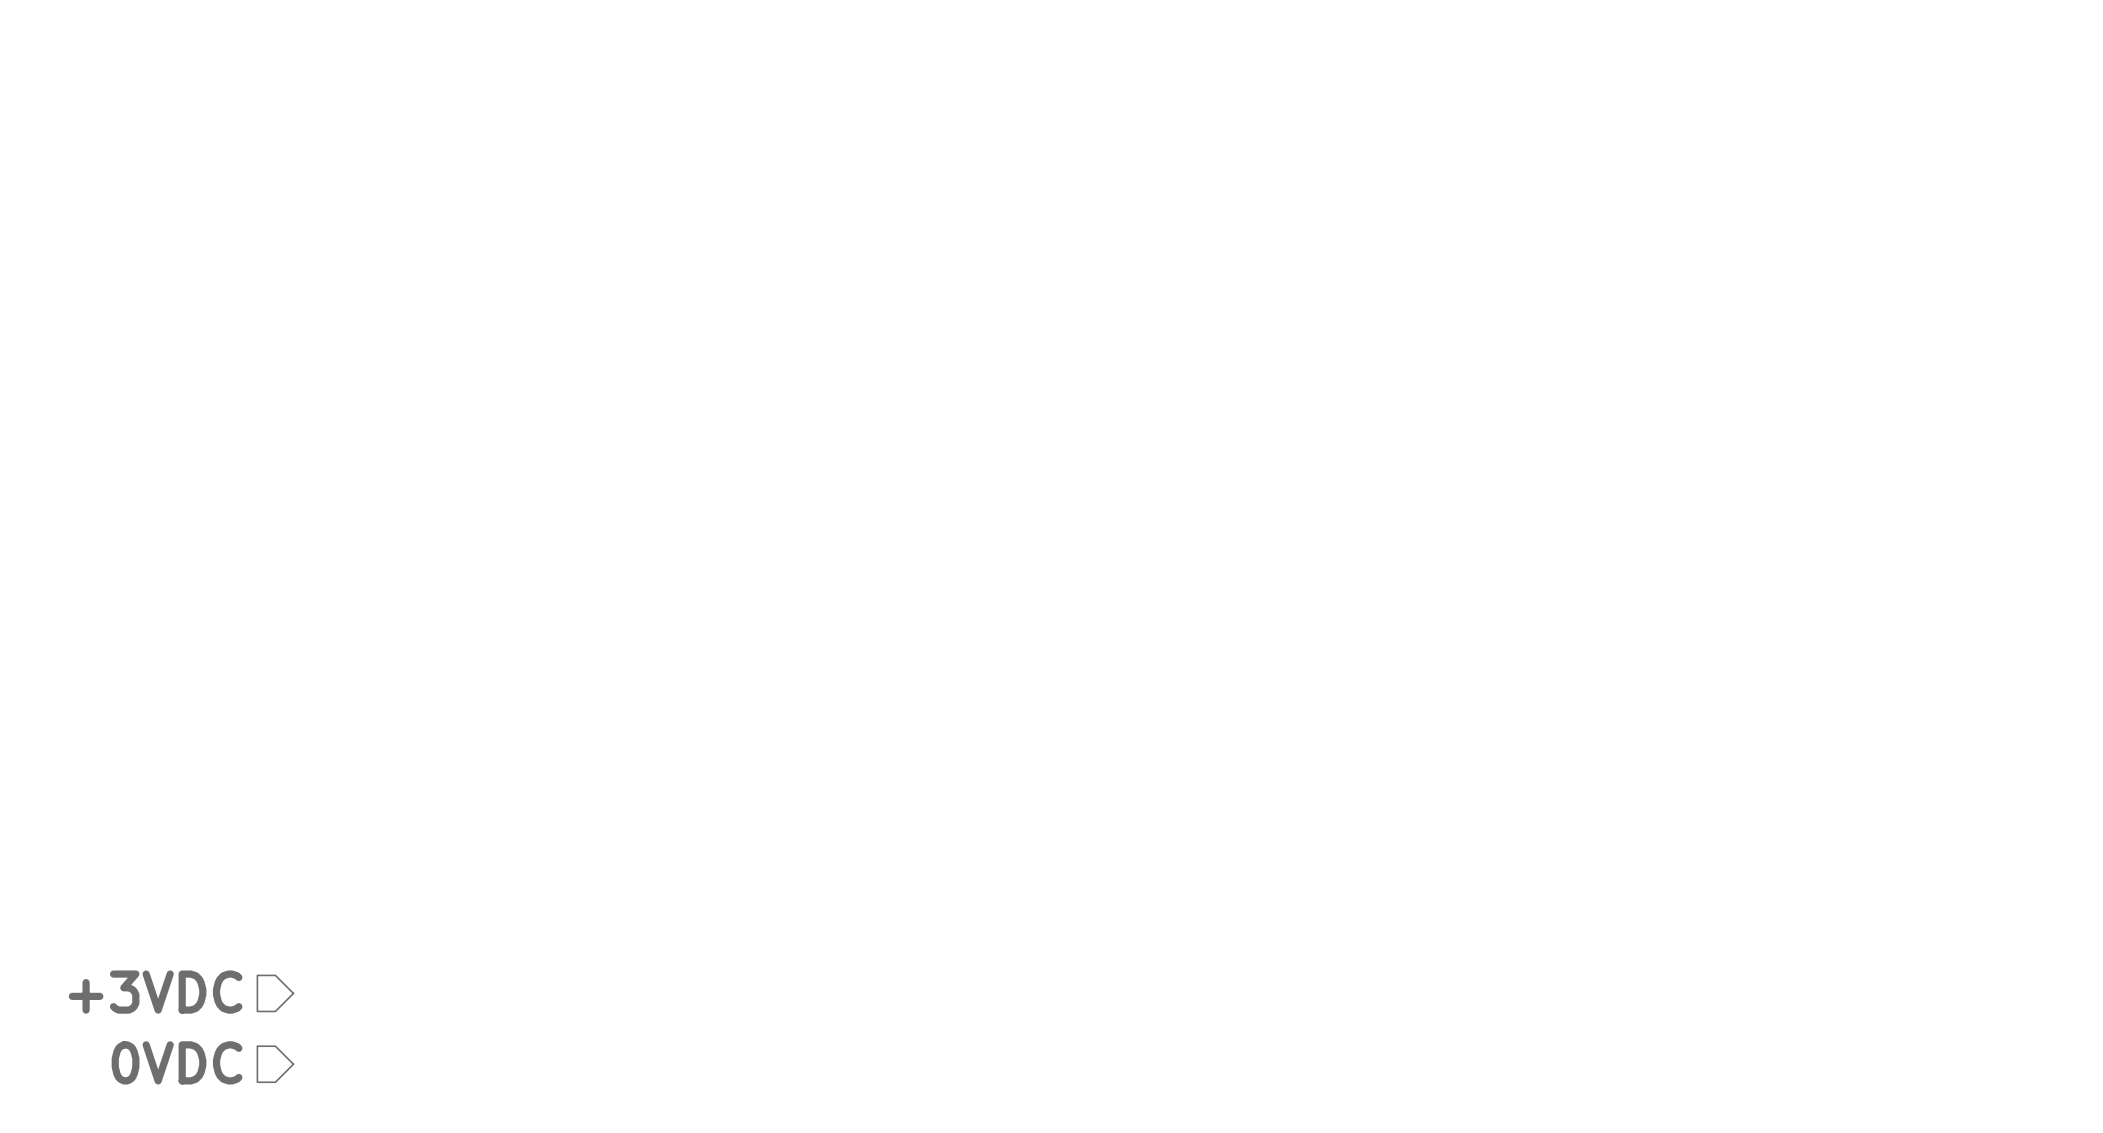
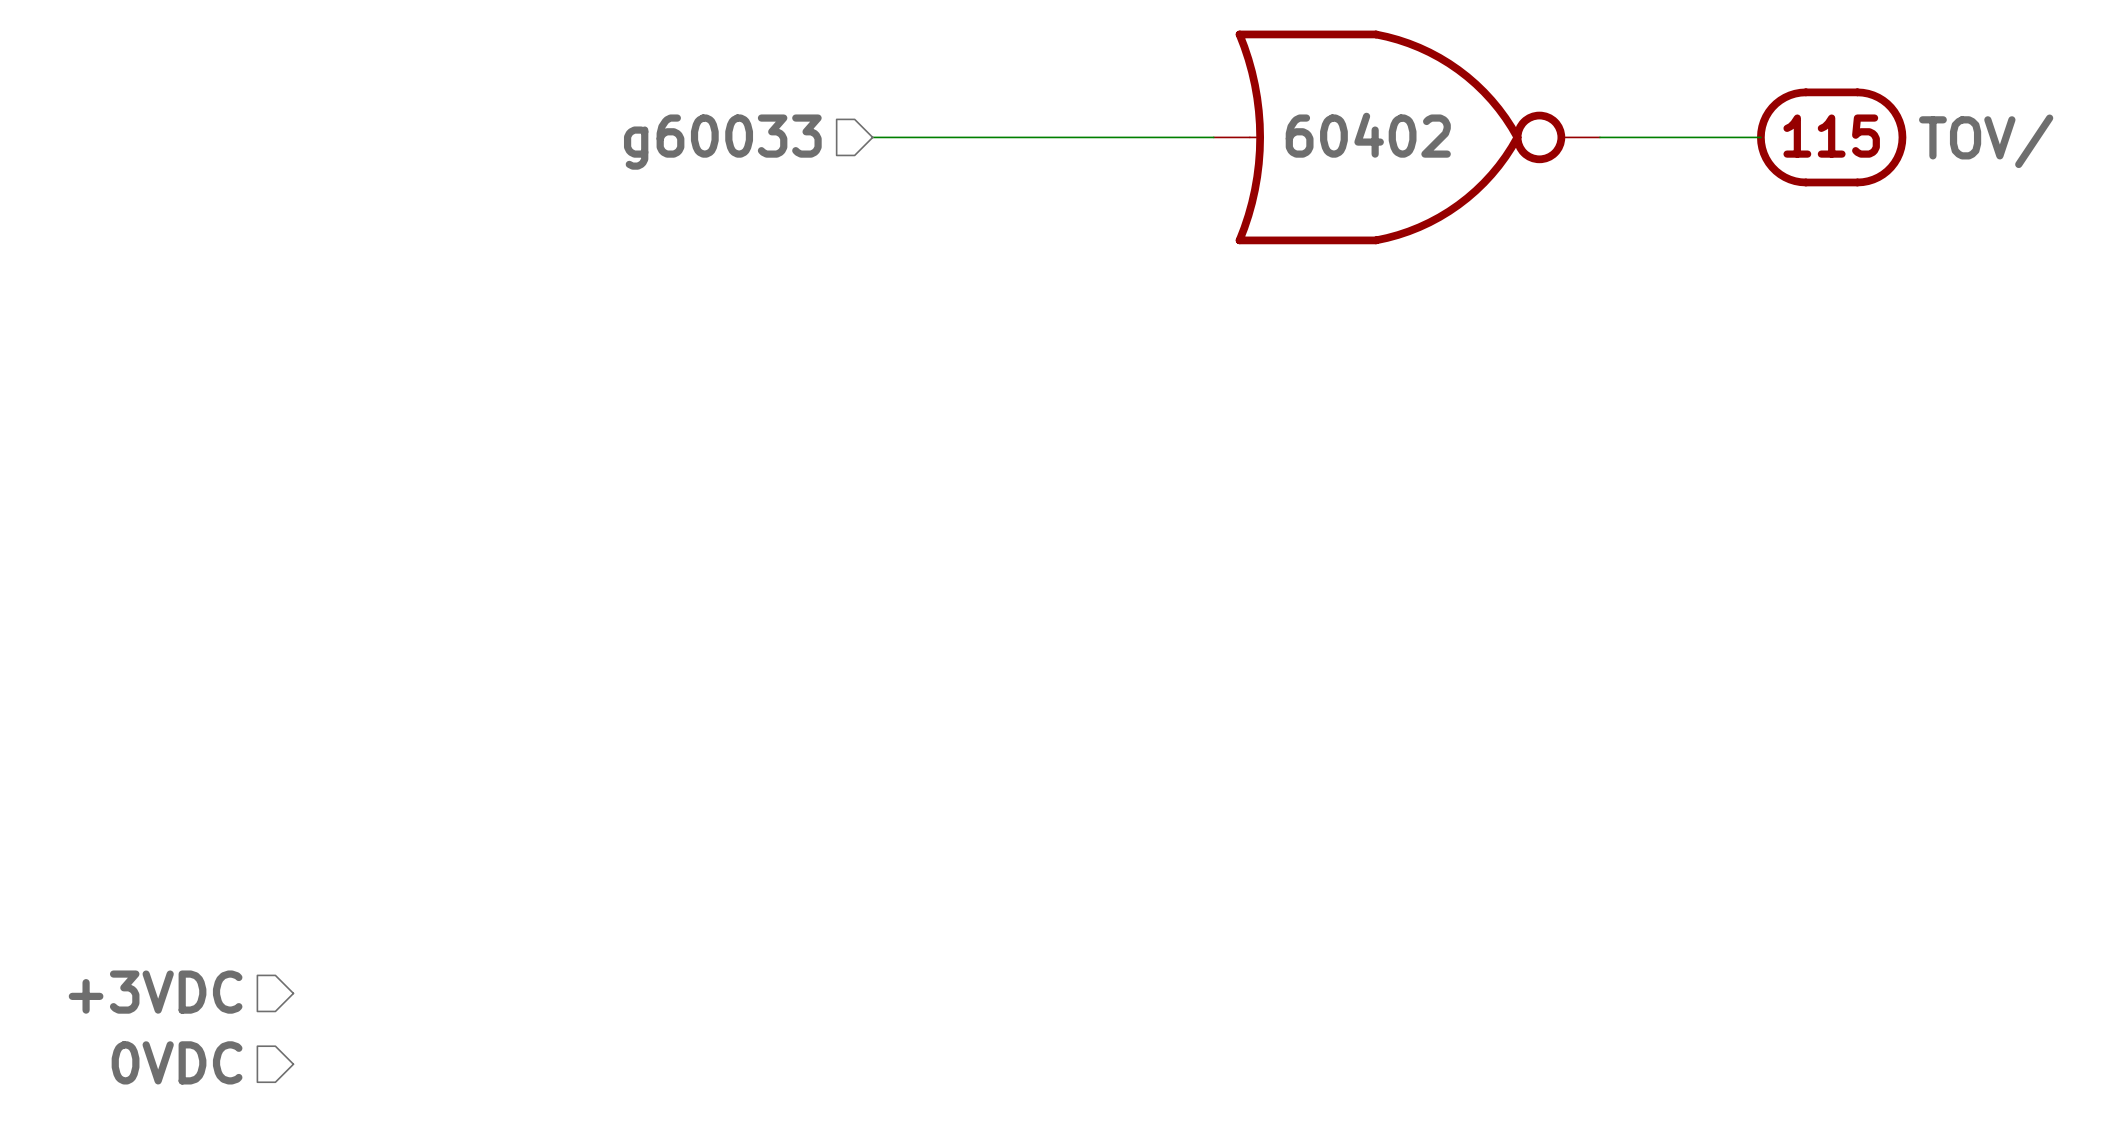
wire: none -> (872, 137) (1213, 137)
part: none -> (1406, 137)
wire: none -> (1599, 137) (1760, 137)
part: none -> (1831, 137)
hierarchical label: none -> g60033 (722, 142)

